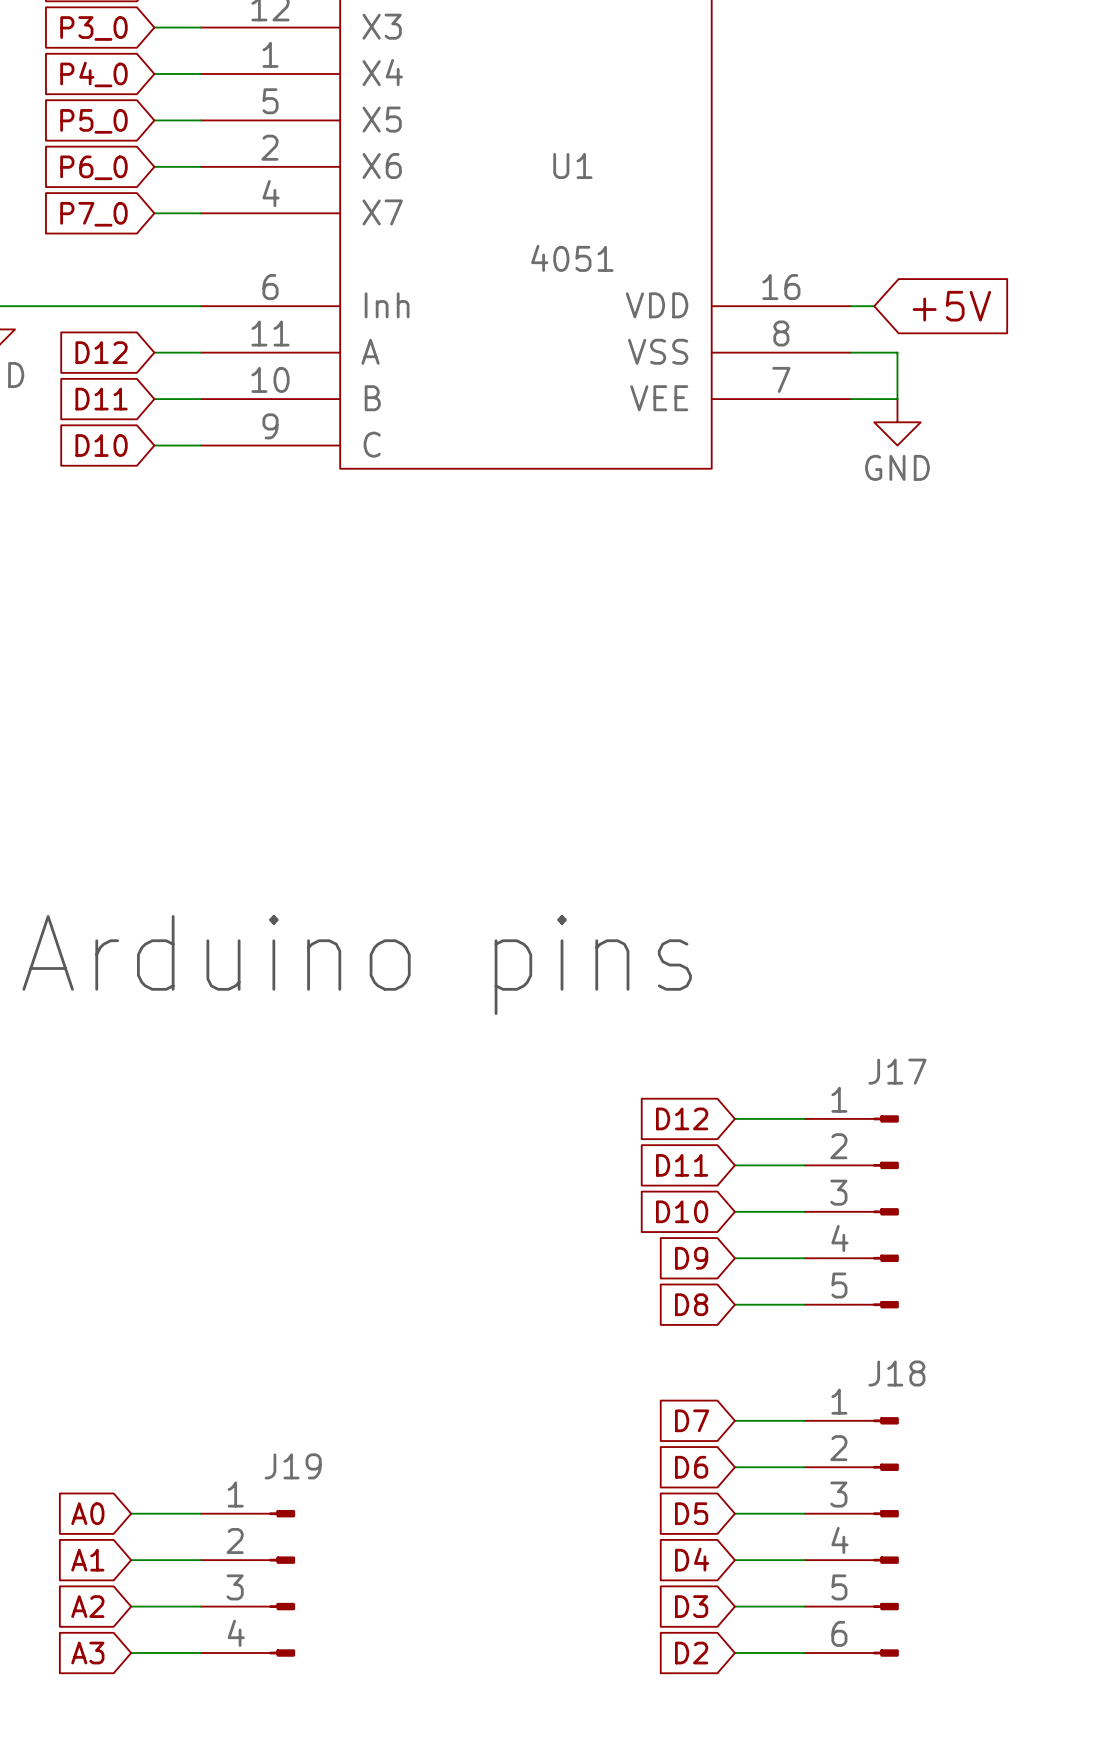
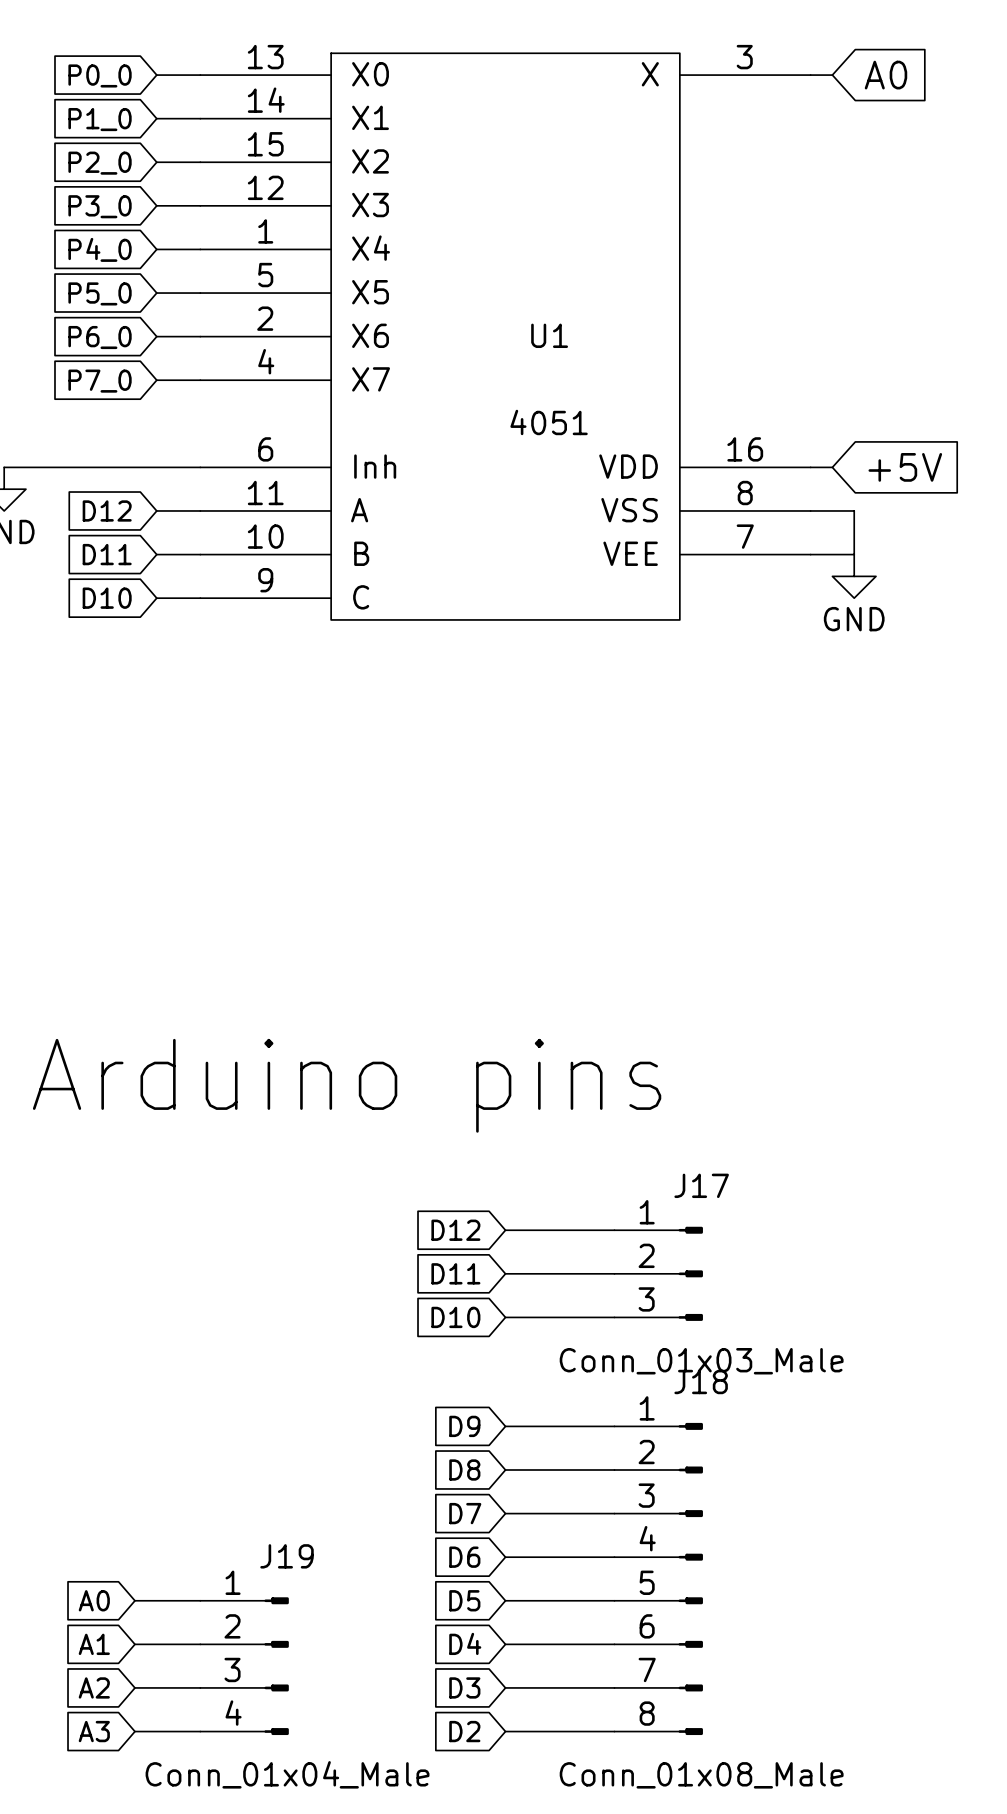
J17 name position: J17 (897, 1071) -> J17 (701, 1185)
J17 symbol: [804, 1115, 899, 1309] -> [614, 1226, 703, 1321]
wire: none -> (505, 1230) (614, 1230)
global label position: D12 (682, 1118) -> D12 (455, 1230)
wire: (734, 1118) (804, 1118) -> none
wire: none -> (505, 1273) (614, 1273)
global label position: D11 (682, 1165) -> D11 (455, 1273)
wire: (734, 1165) (804, 1165) -> none
wire: none -> (505, 1317) (614, 1317)
global label position: D10 (682, 1211) -> D10 (455, 1317)
wire: (734, 1211) (804, 1211) -> none
global label position: D9 (691, 1258) -> D9 (464, 1426)
wire: (734, 1258) (804, 1258) -> none
J17 value: none -> Conn_01x03_Male (701, 1361)
global label position: D8 (691, 1304) -> D8 (464, 1470)
wire: (734, 1304) (804, 1304) -> none
wire: none -> (505, 1426) (614, 1426)
J18 name position: J18 (896, 1373) -> J18 (701, 1382)
wire: none -> (505, 1470) (614, 1470)
J18 symbol: [804, 1417, 899, 1657] -> [614, 1422, 703, 1736]
wire: none -> (505, 1513) (614, 1513)
global label position: D7 (692, 1420) -> D7 (465, 1513)
wire: (734, 1420) (804, 1420) -> none
wire: none -> (505, 1557) (614, 1557)
global label position: D6 (691, 1467) -> D6 (464, 1557)
wire: (734, 1467) (804, 1467) -> none
wire: none -> (505, 1600) (614, 1600)
global label position: D5 (691, 1513) -> D5 (464, 1600)
wire: (734, 1513) (804, 1513) -> none
global label position: D4 (692, 1559) -> D4 (465, 1643)
wire: none -> (505, 1644) (614, 1644)
wire: (734, 1560) (804, 1560) -> none
wire: none -> (505, 1687) (614, 1687)
global label position: D3 (691, 1606) -> D3 (464, 1687)
wire: (734, 1606) (804, 1606) -> none
wire: none -> (505, 1731) (614, 1731)
global label position: D2 (691, 1653) -> D2 (464, 1731)
wire: (734, 1653) (804, 1653) -> none
J19 value: none -> Conn_01x04_Male (287, 1774)
J18 value: none -> Conn_01x08_Male (701, 1775)

